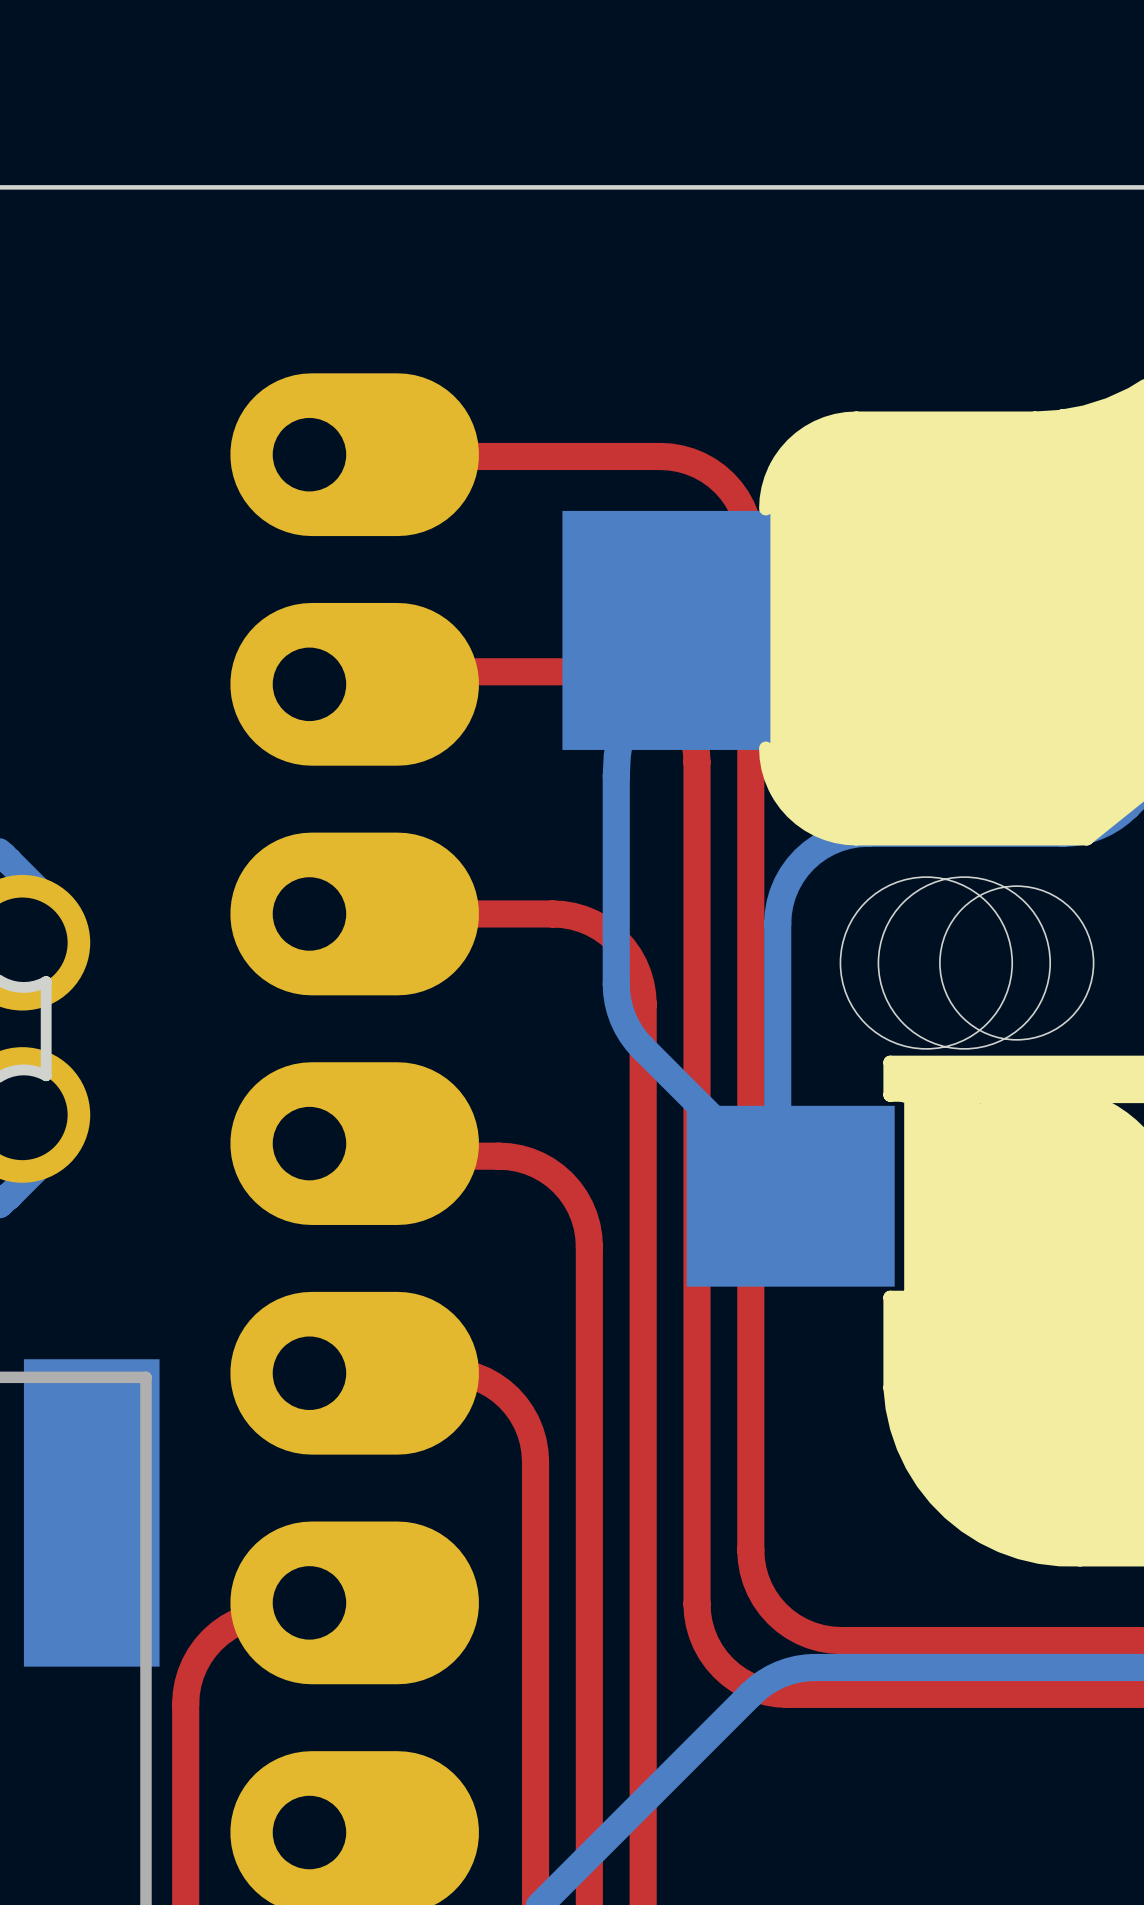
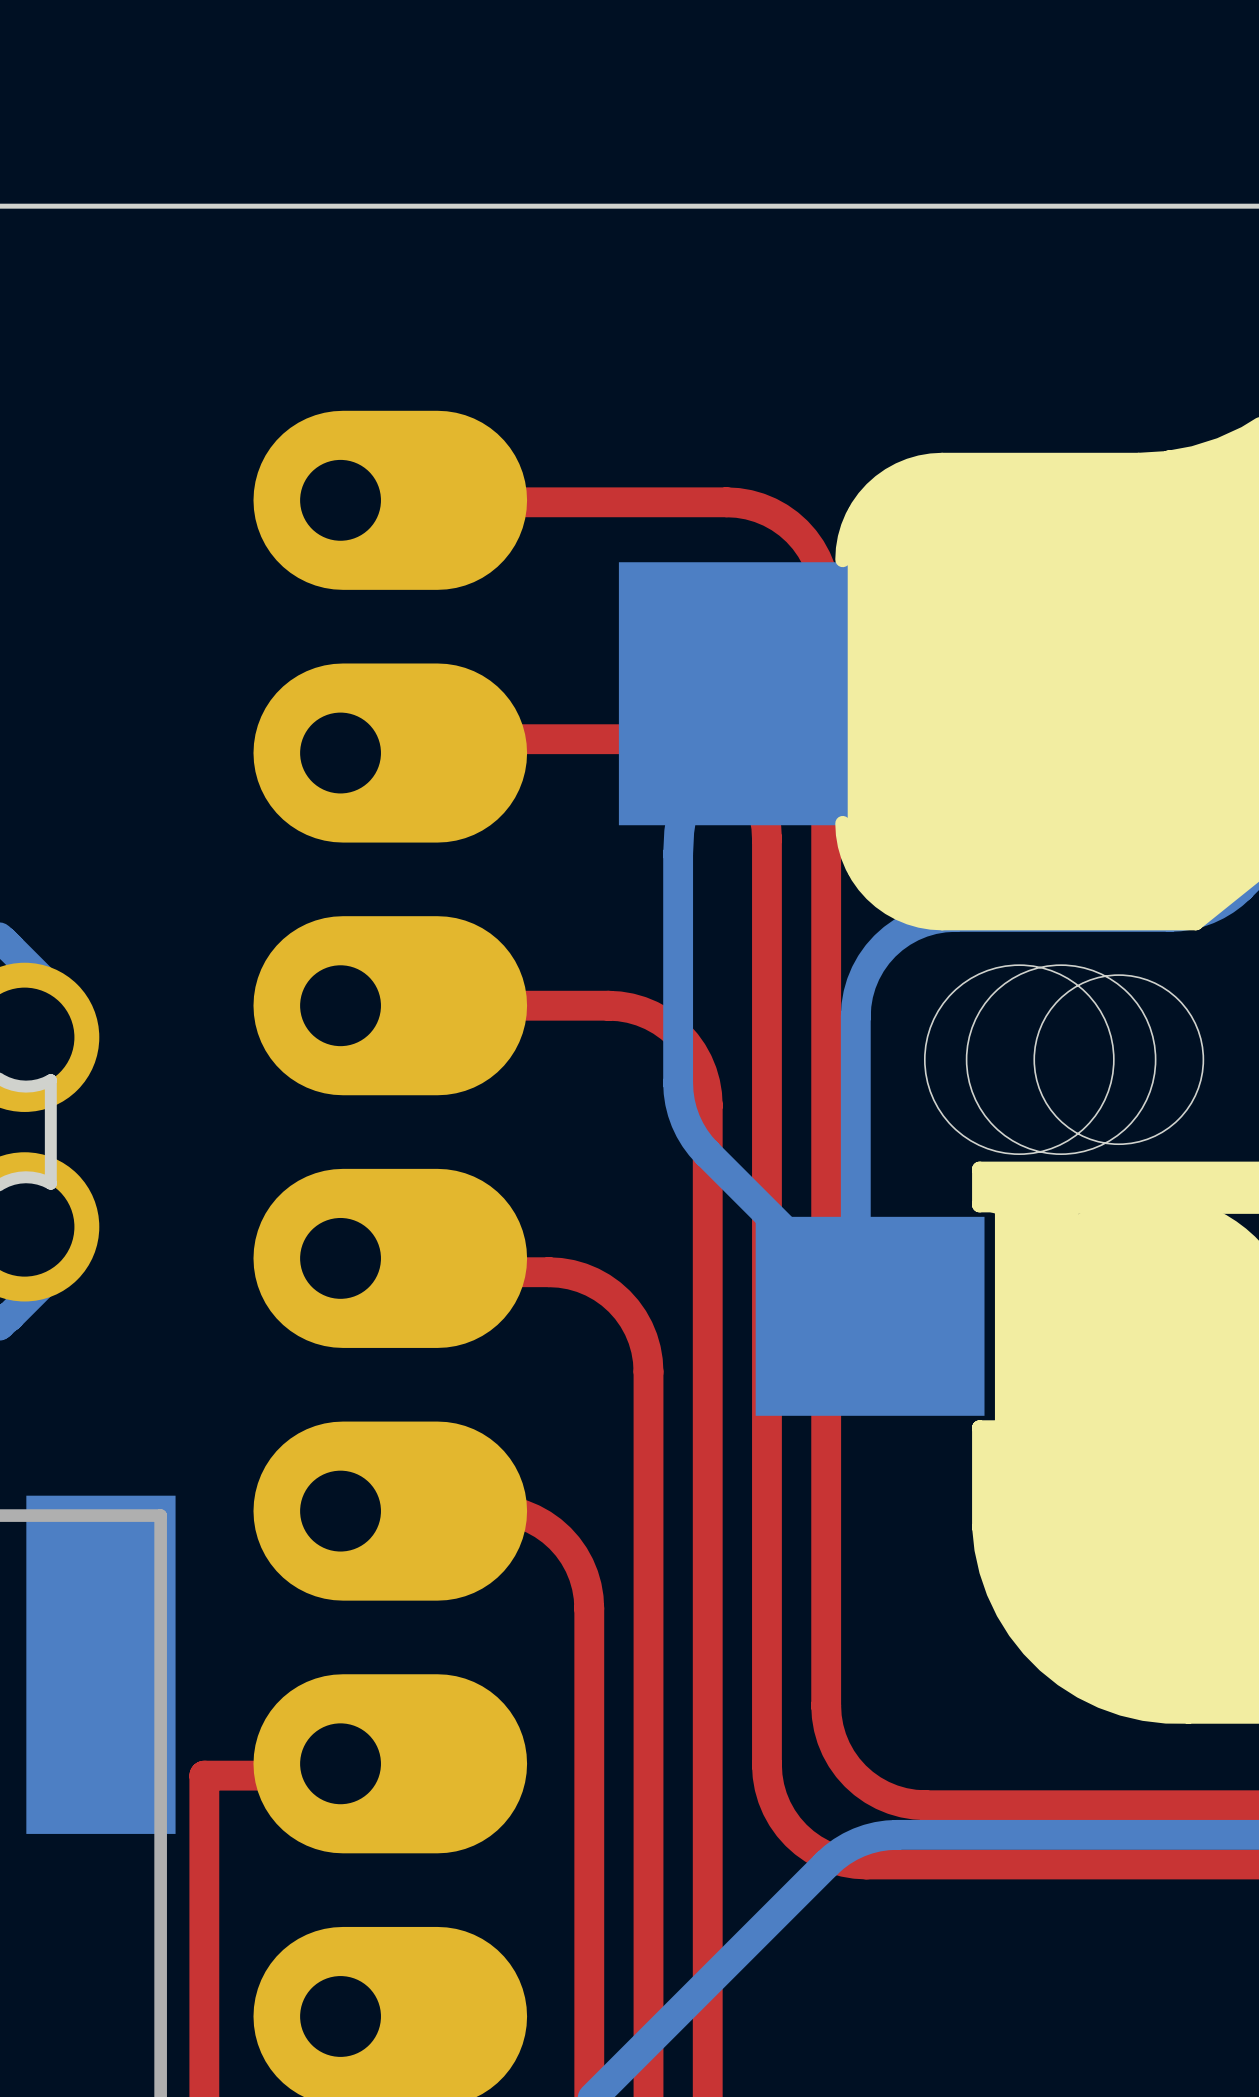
top track: (276, 1613) (246, 1618) (227, 1627) (212, 1640) (194, 1664) (187, 1683) (185, 1704) -> (303, 1775) (204, 1775) (204, 1875)

